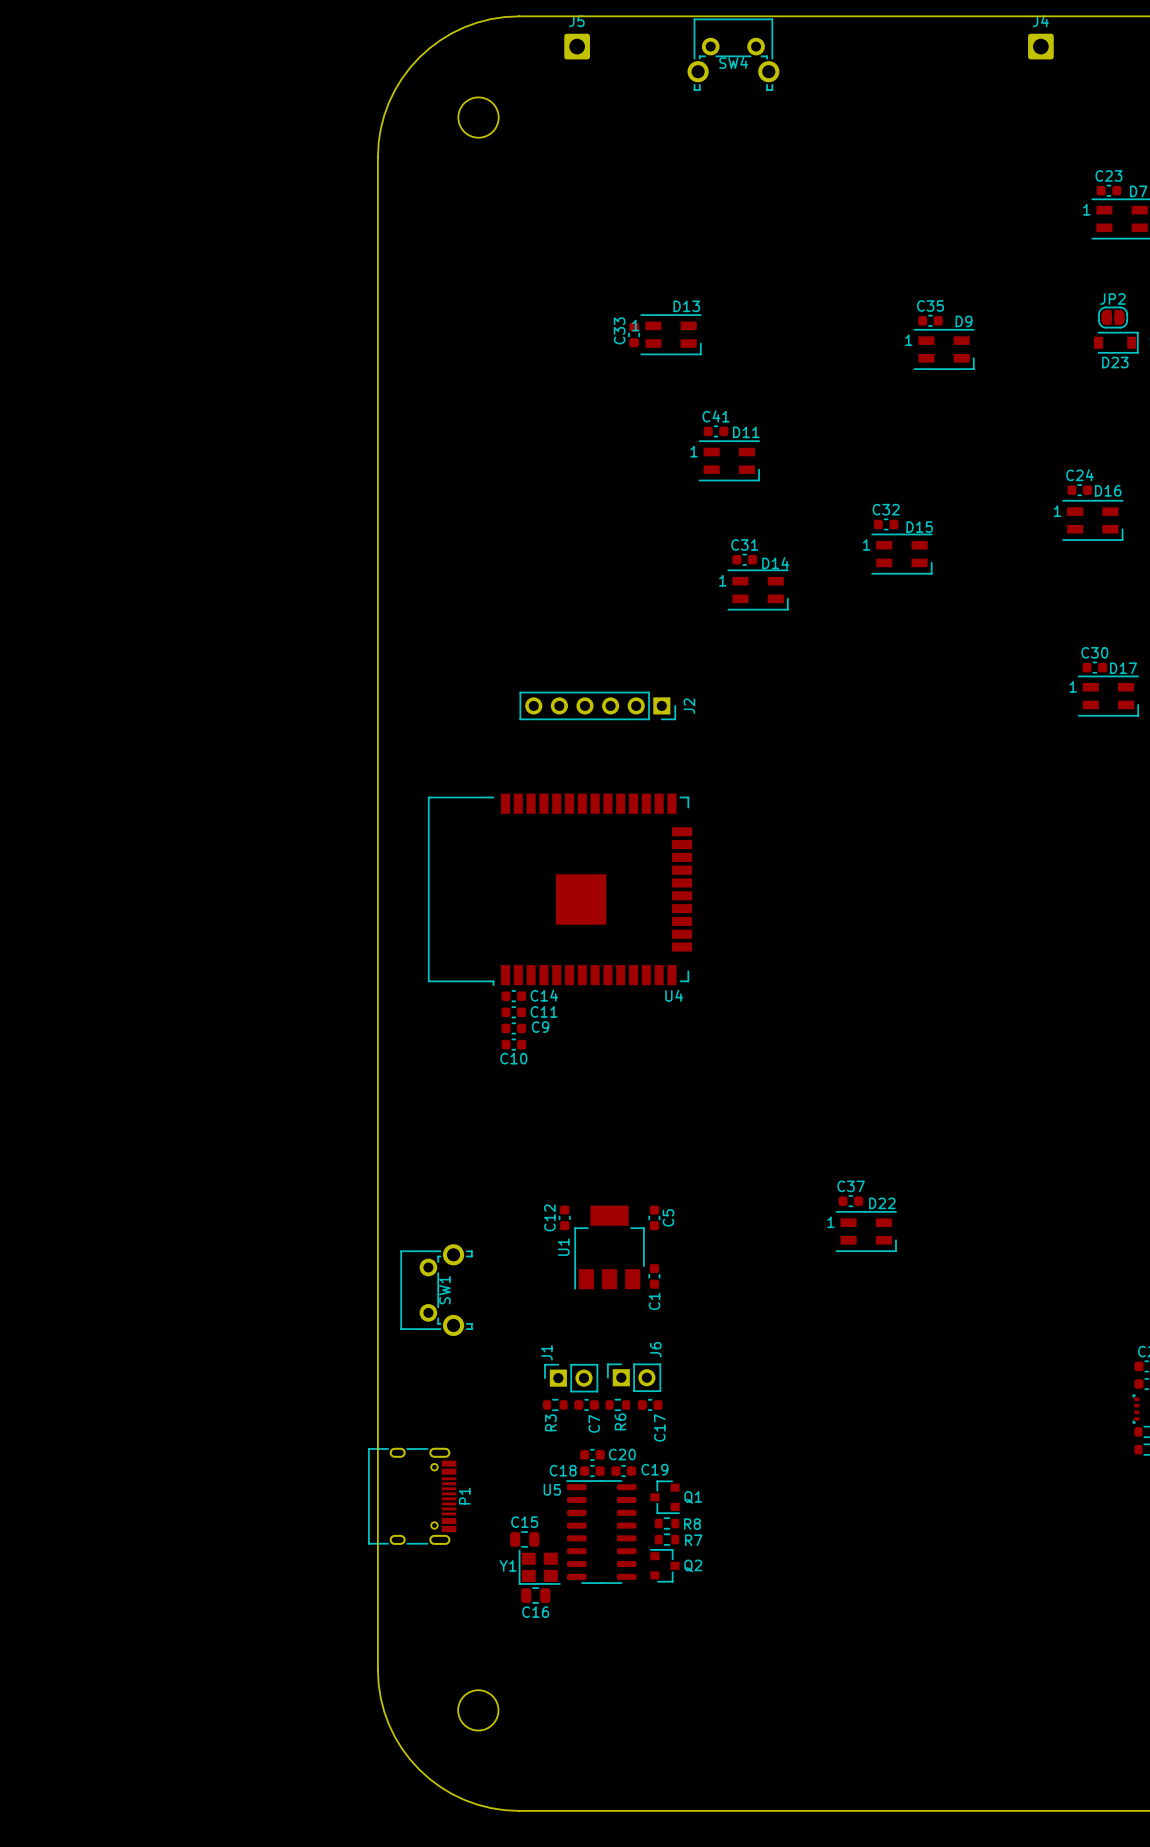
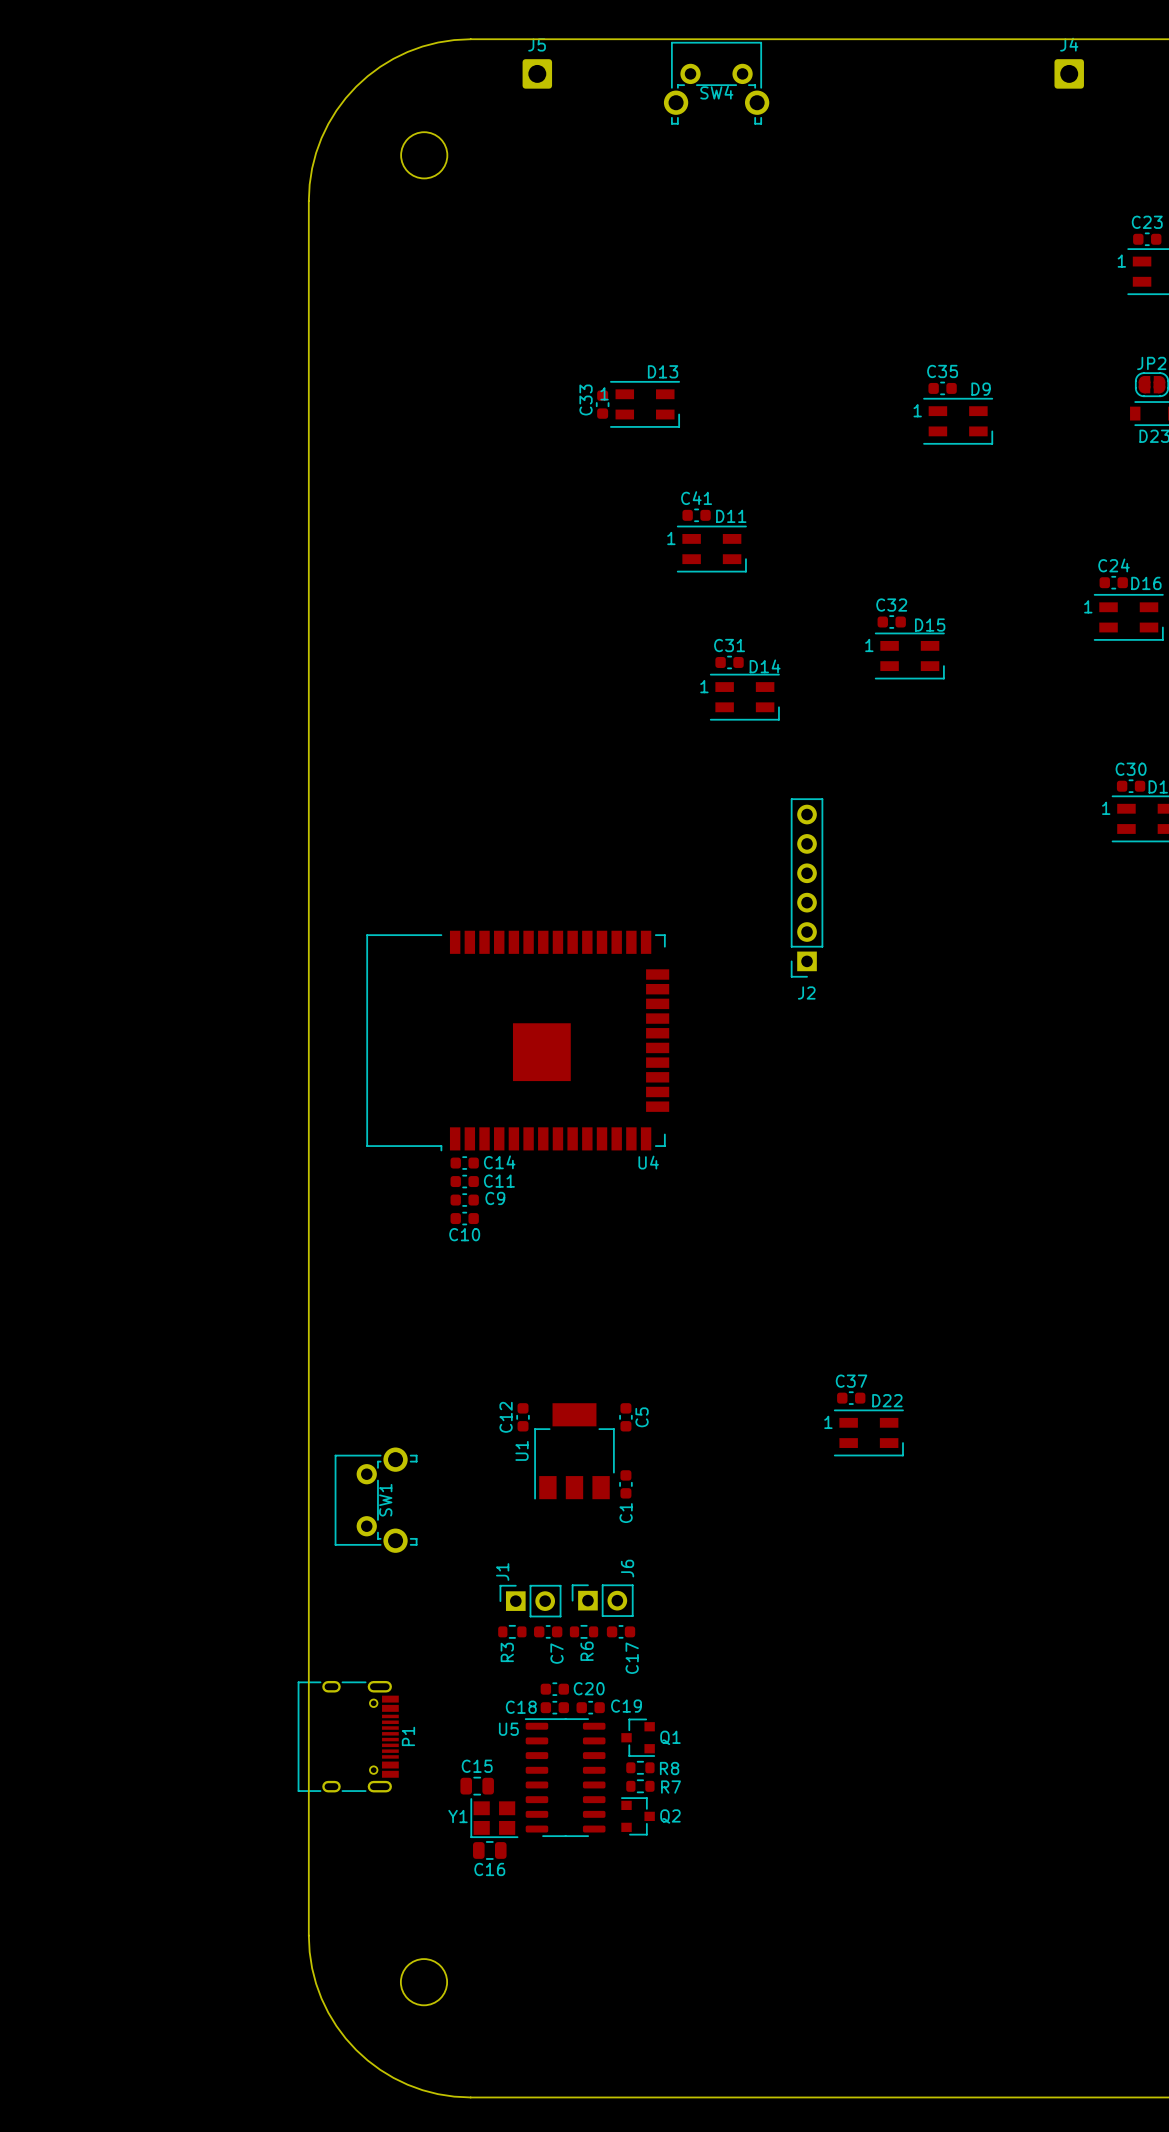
J2 rotation: 0° (597, 705) -> 90° clockwise (807, 887)
J2 position: (597, 705) -> (807, 887)

